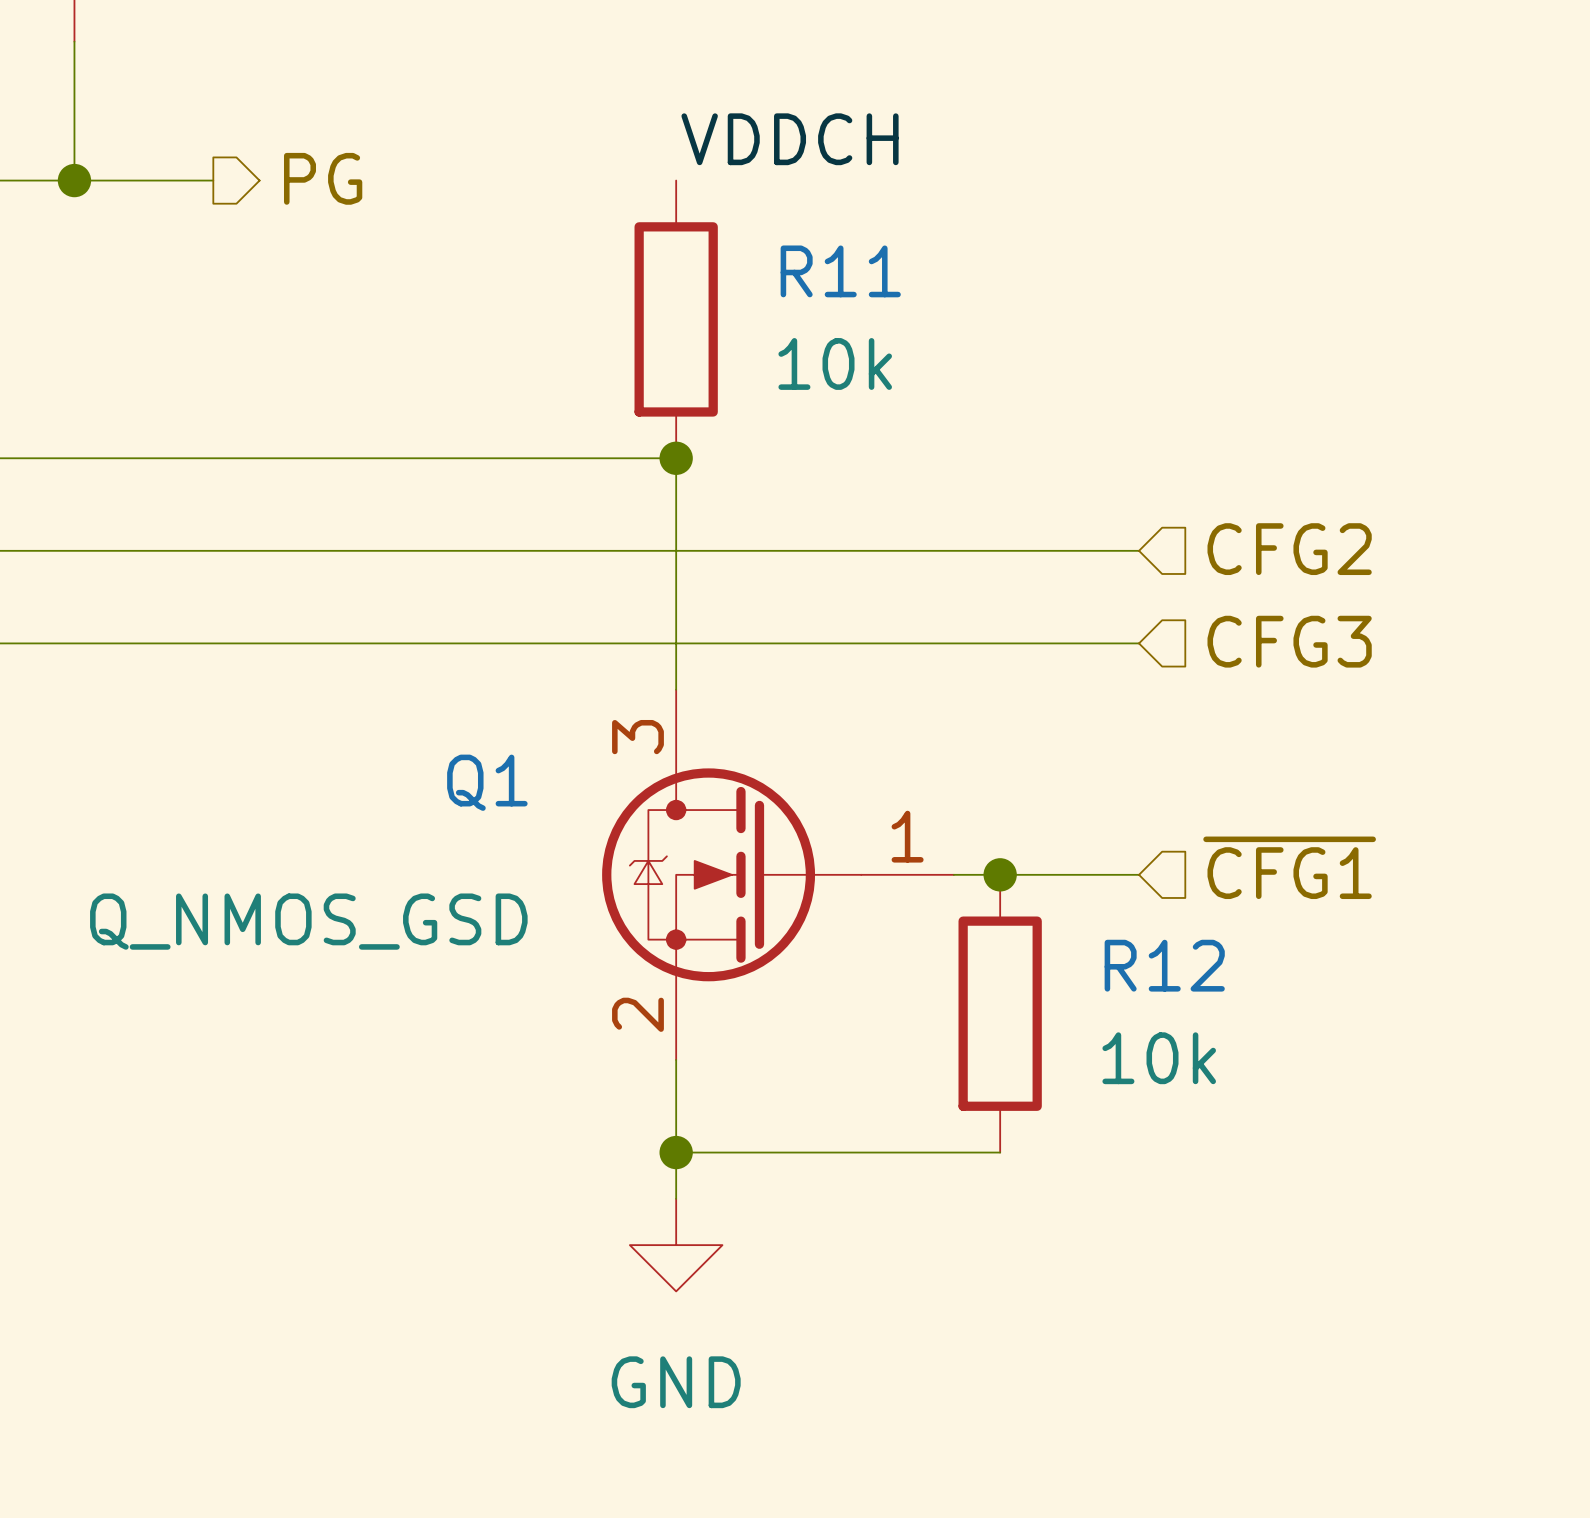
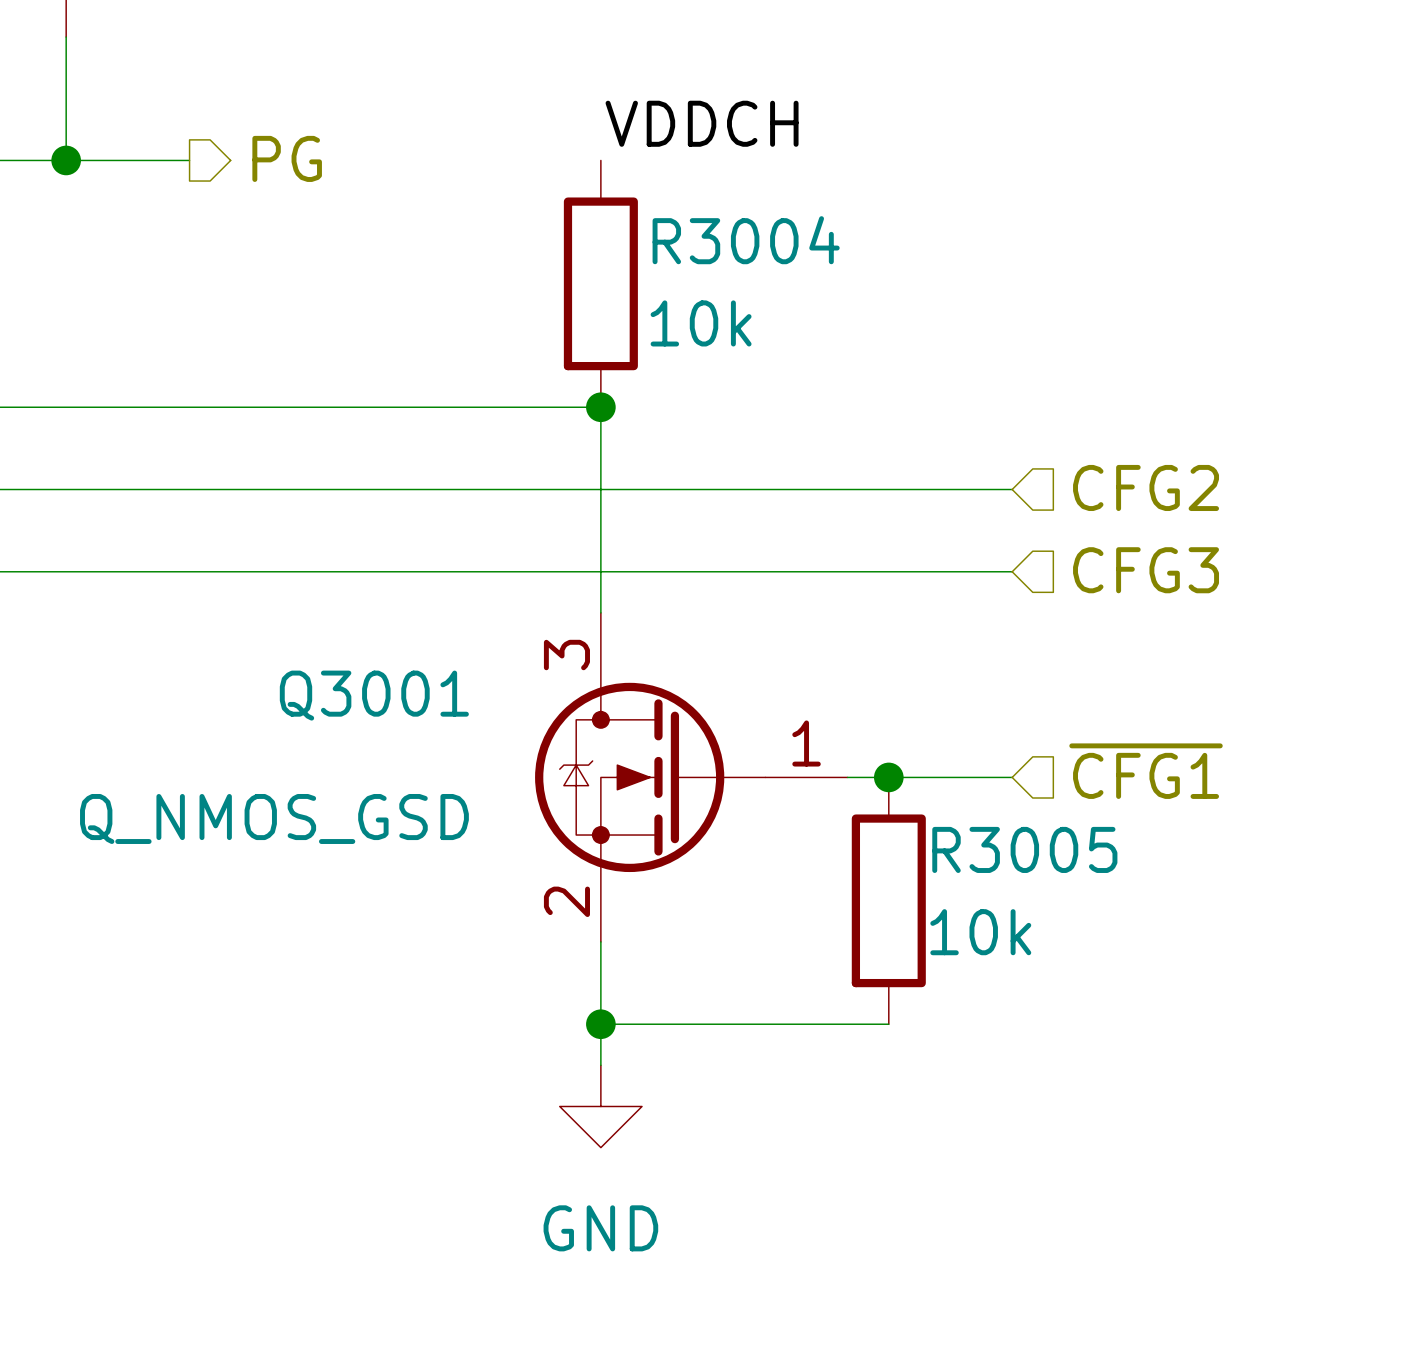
R11 name: R11 (840, 271) -> R3004 (746, 240)
R11 value position: 10k (835, 363) -> 10k (701, 323)
Q1 name: Q1 (487, 782) -> Q3001 (374, 695)
R12 name: R12 (1164, 965) -> R3005 (1024, 849)
R12 value position: 10k (1159, 1058) -> 10k (980, 932)

